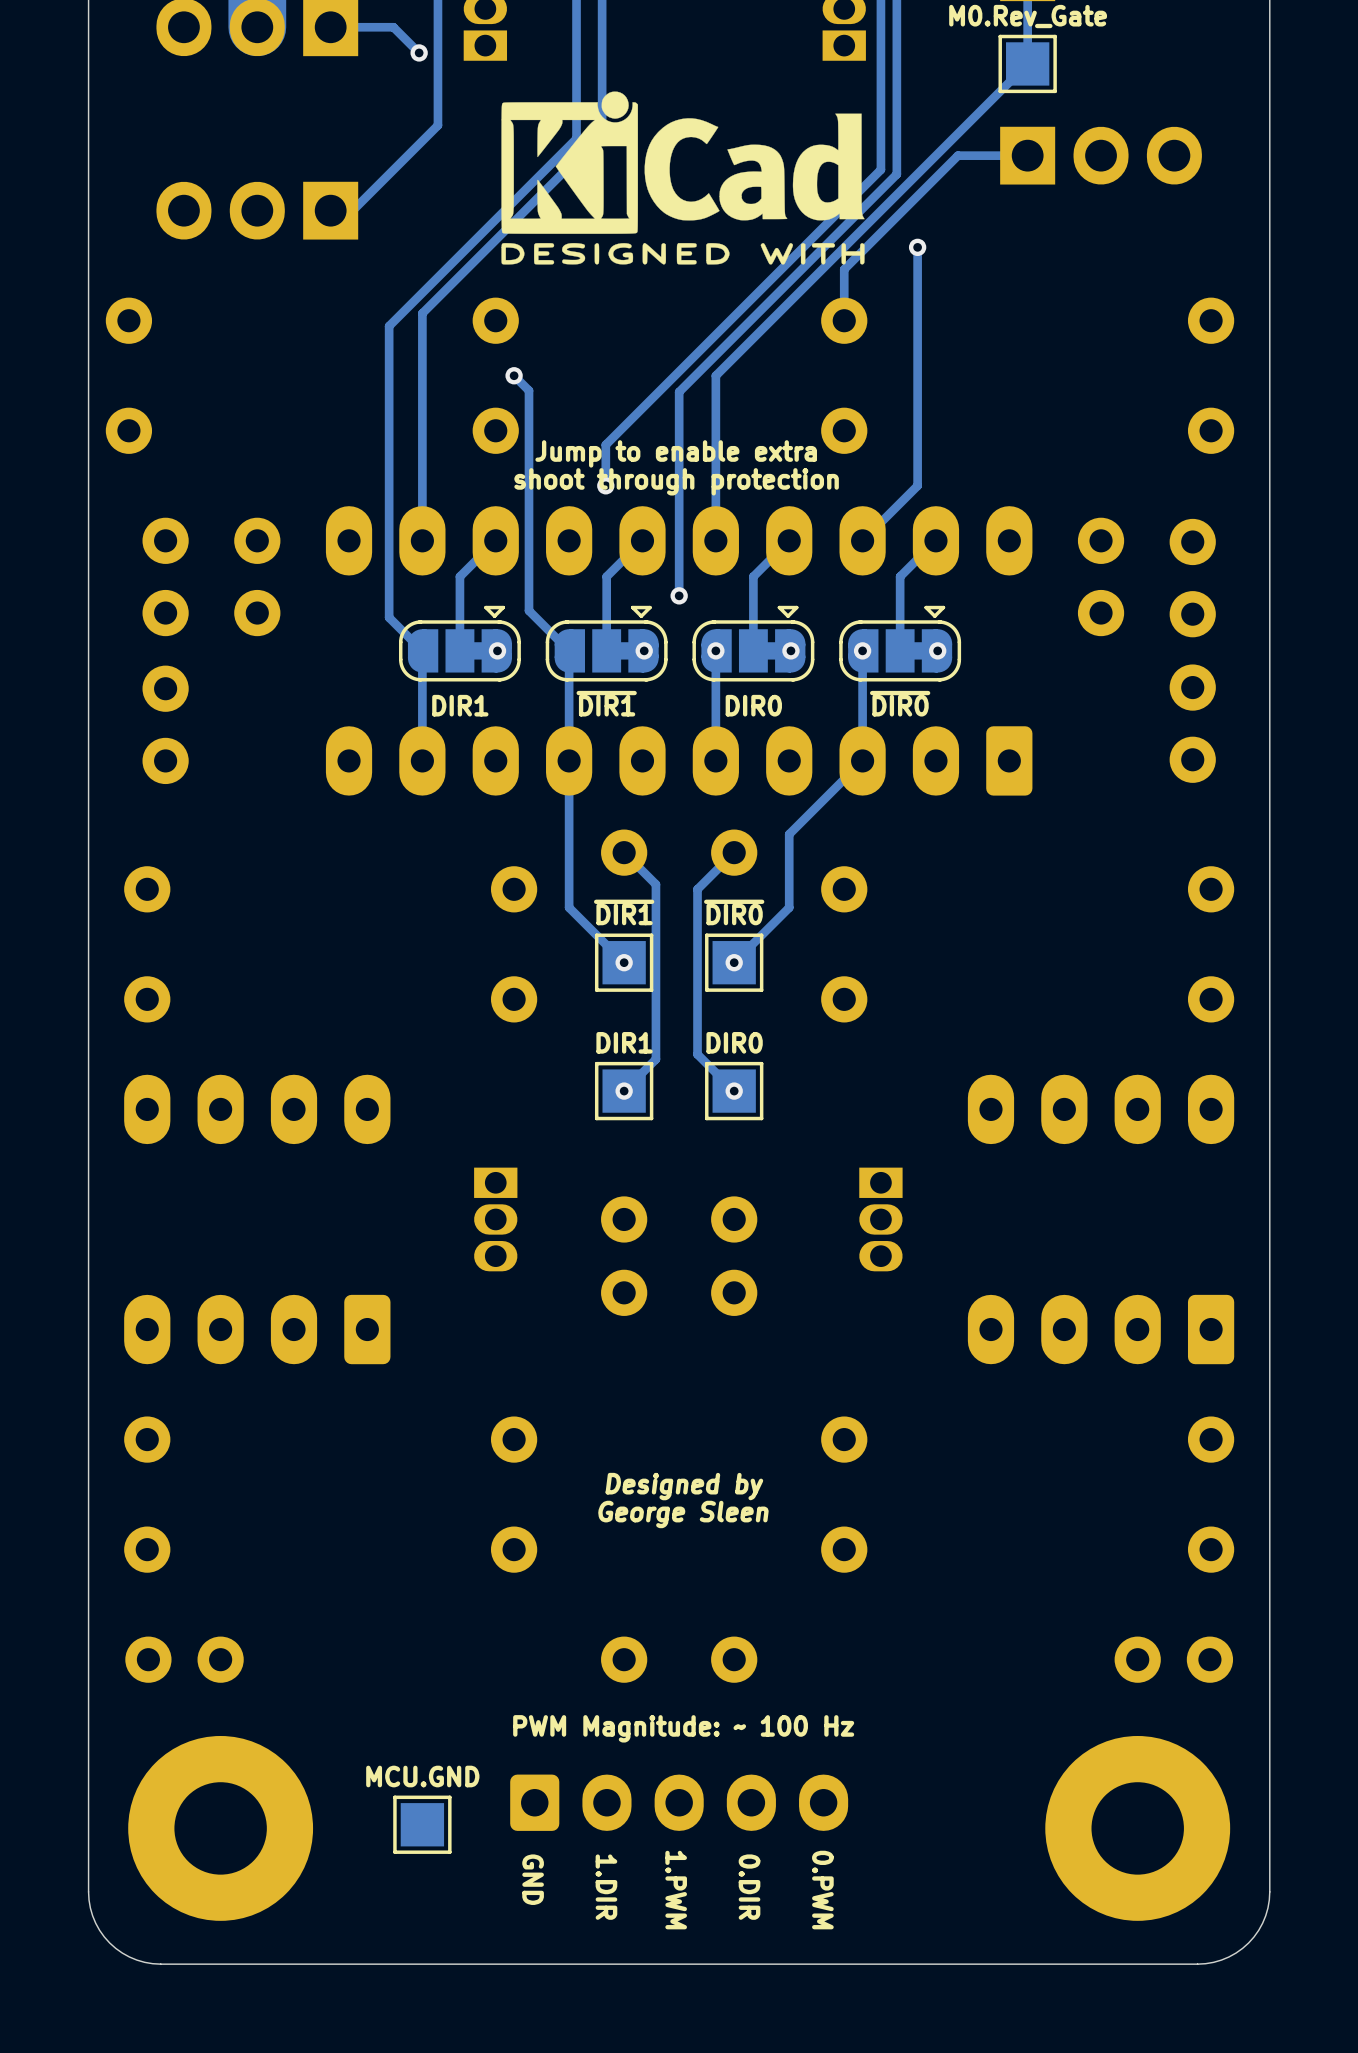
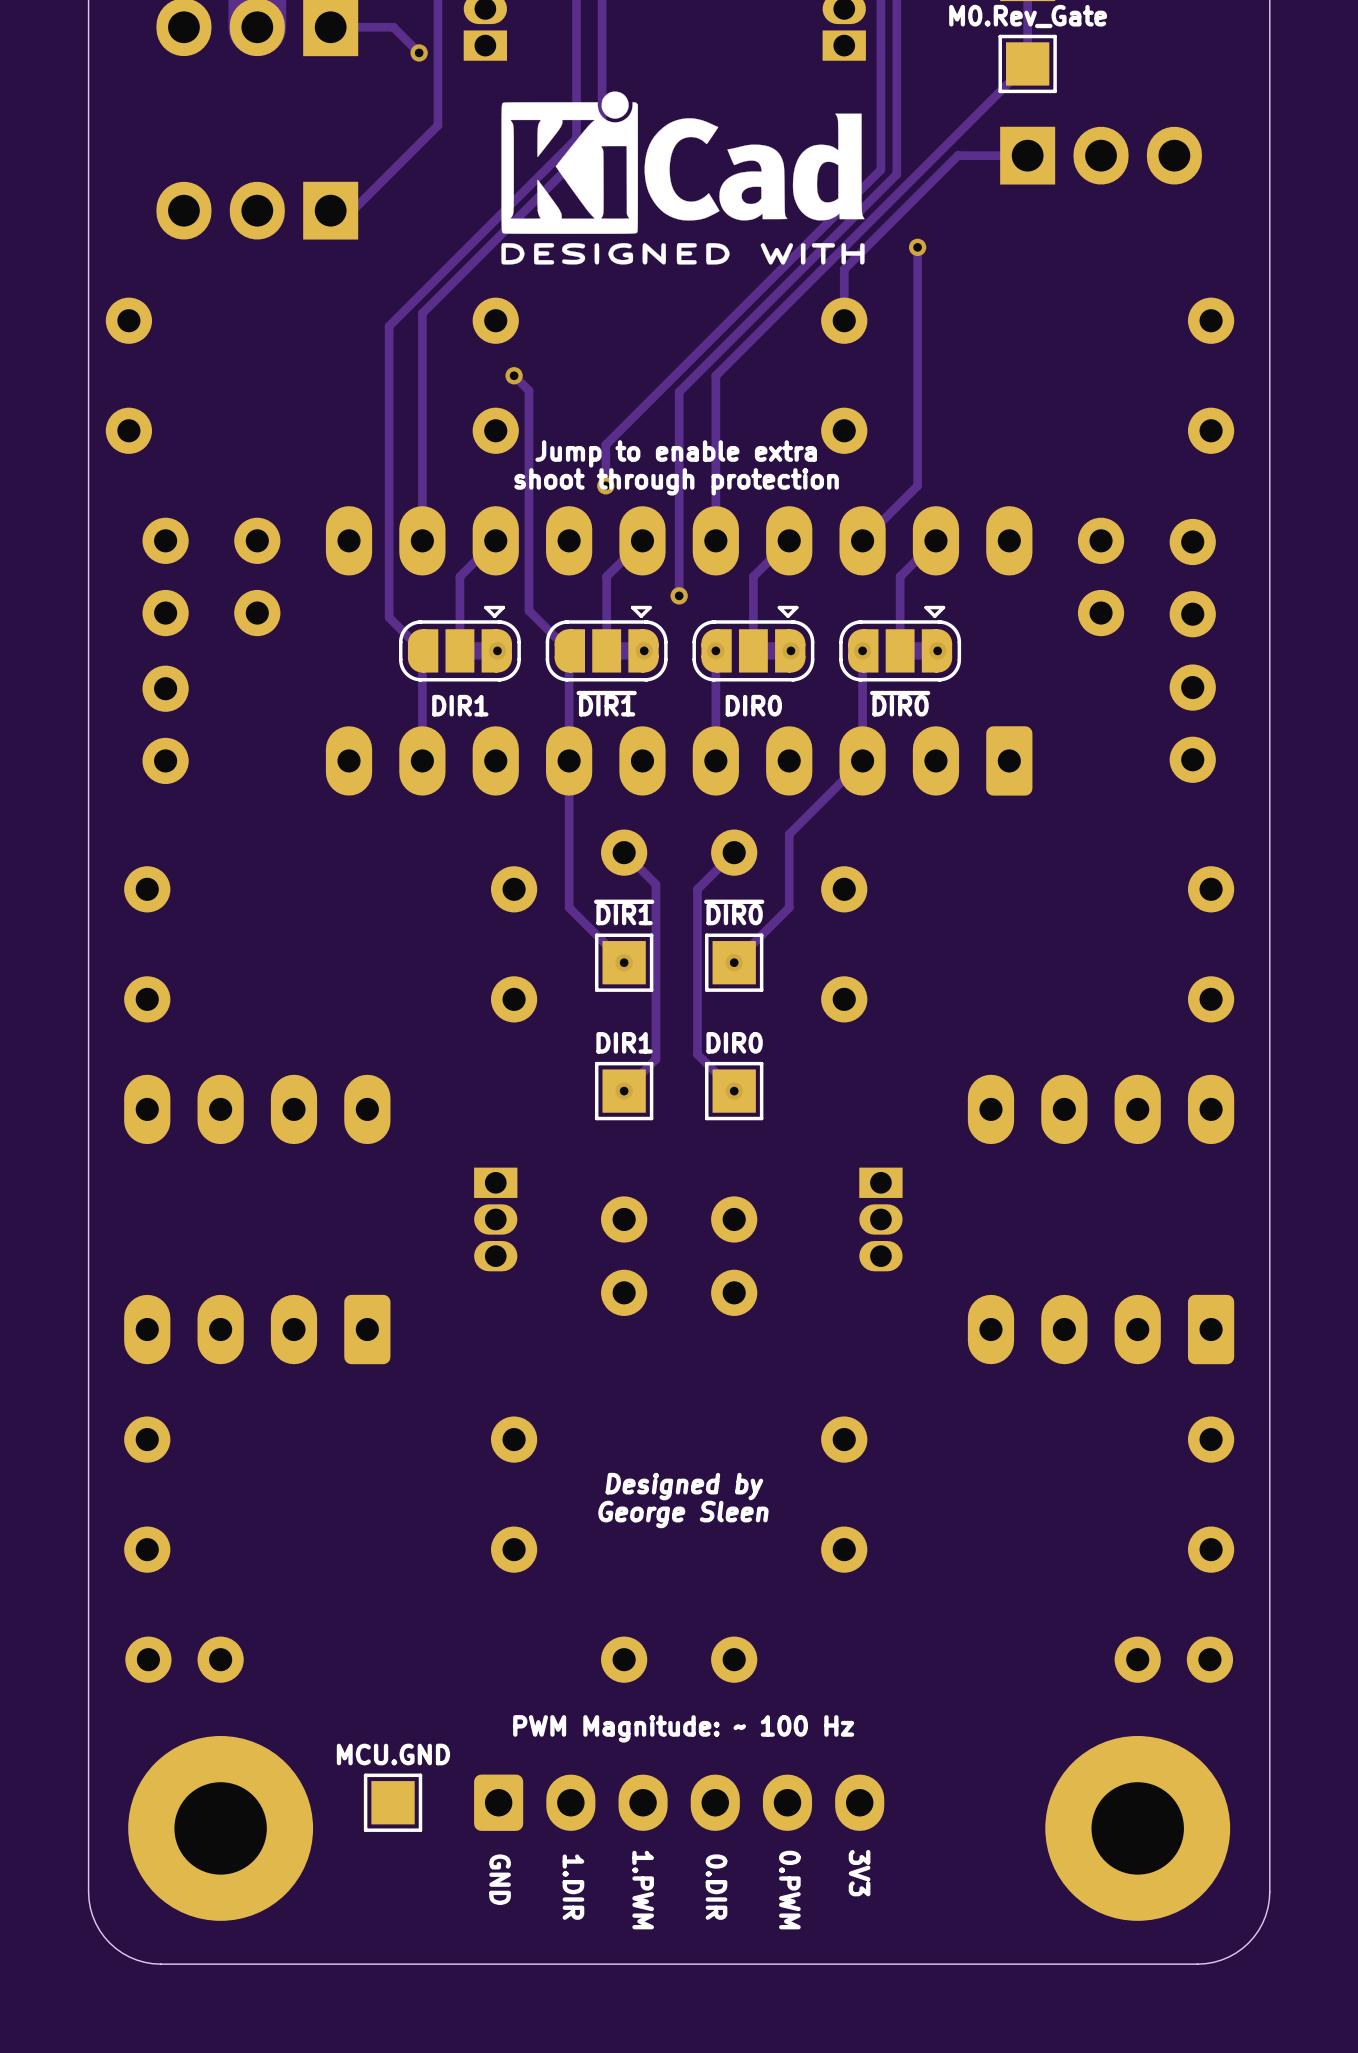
part footprint: [510, 1774, 849, 1831] -> [474, 1774, 885, 1831]
MCU.GND position: (422, 1824) -> (393, 1802)
text: none -> 3V3 (859, 1873)
text position: GND (533, 1879) -> GND (500, 1879)
text position: 1.DIR (606, 1887) -> 1.DIR (573, 1887)
text position: 0.DIR (749, 1887) -> 0.DIR (716, 1887)
text position: 1.PWM (676, 1890) -> 1.PWM (643, 1890)
text position: 0.PWM (822, 1890) -> 0.PWM (789, 1890)

